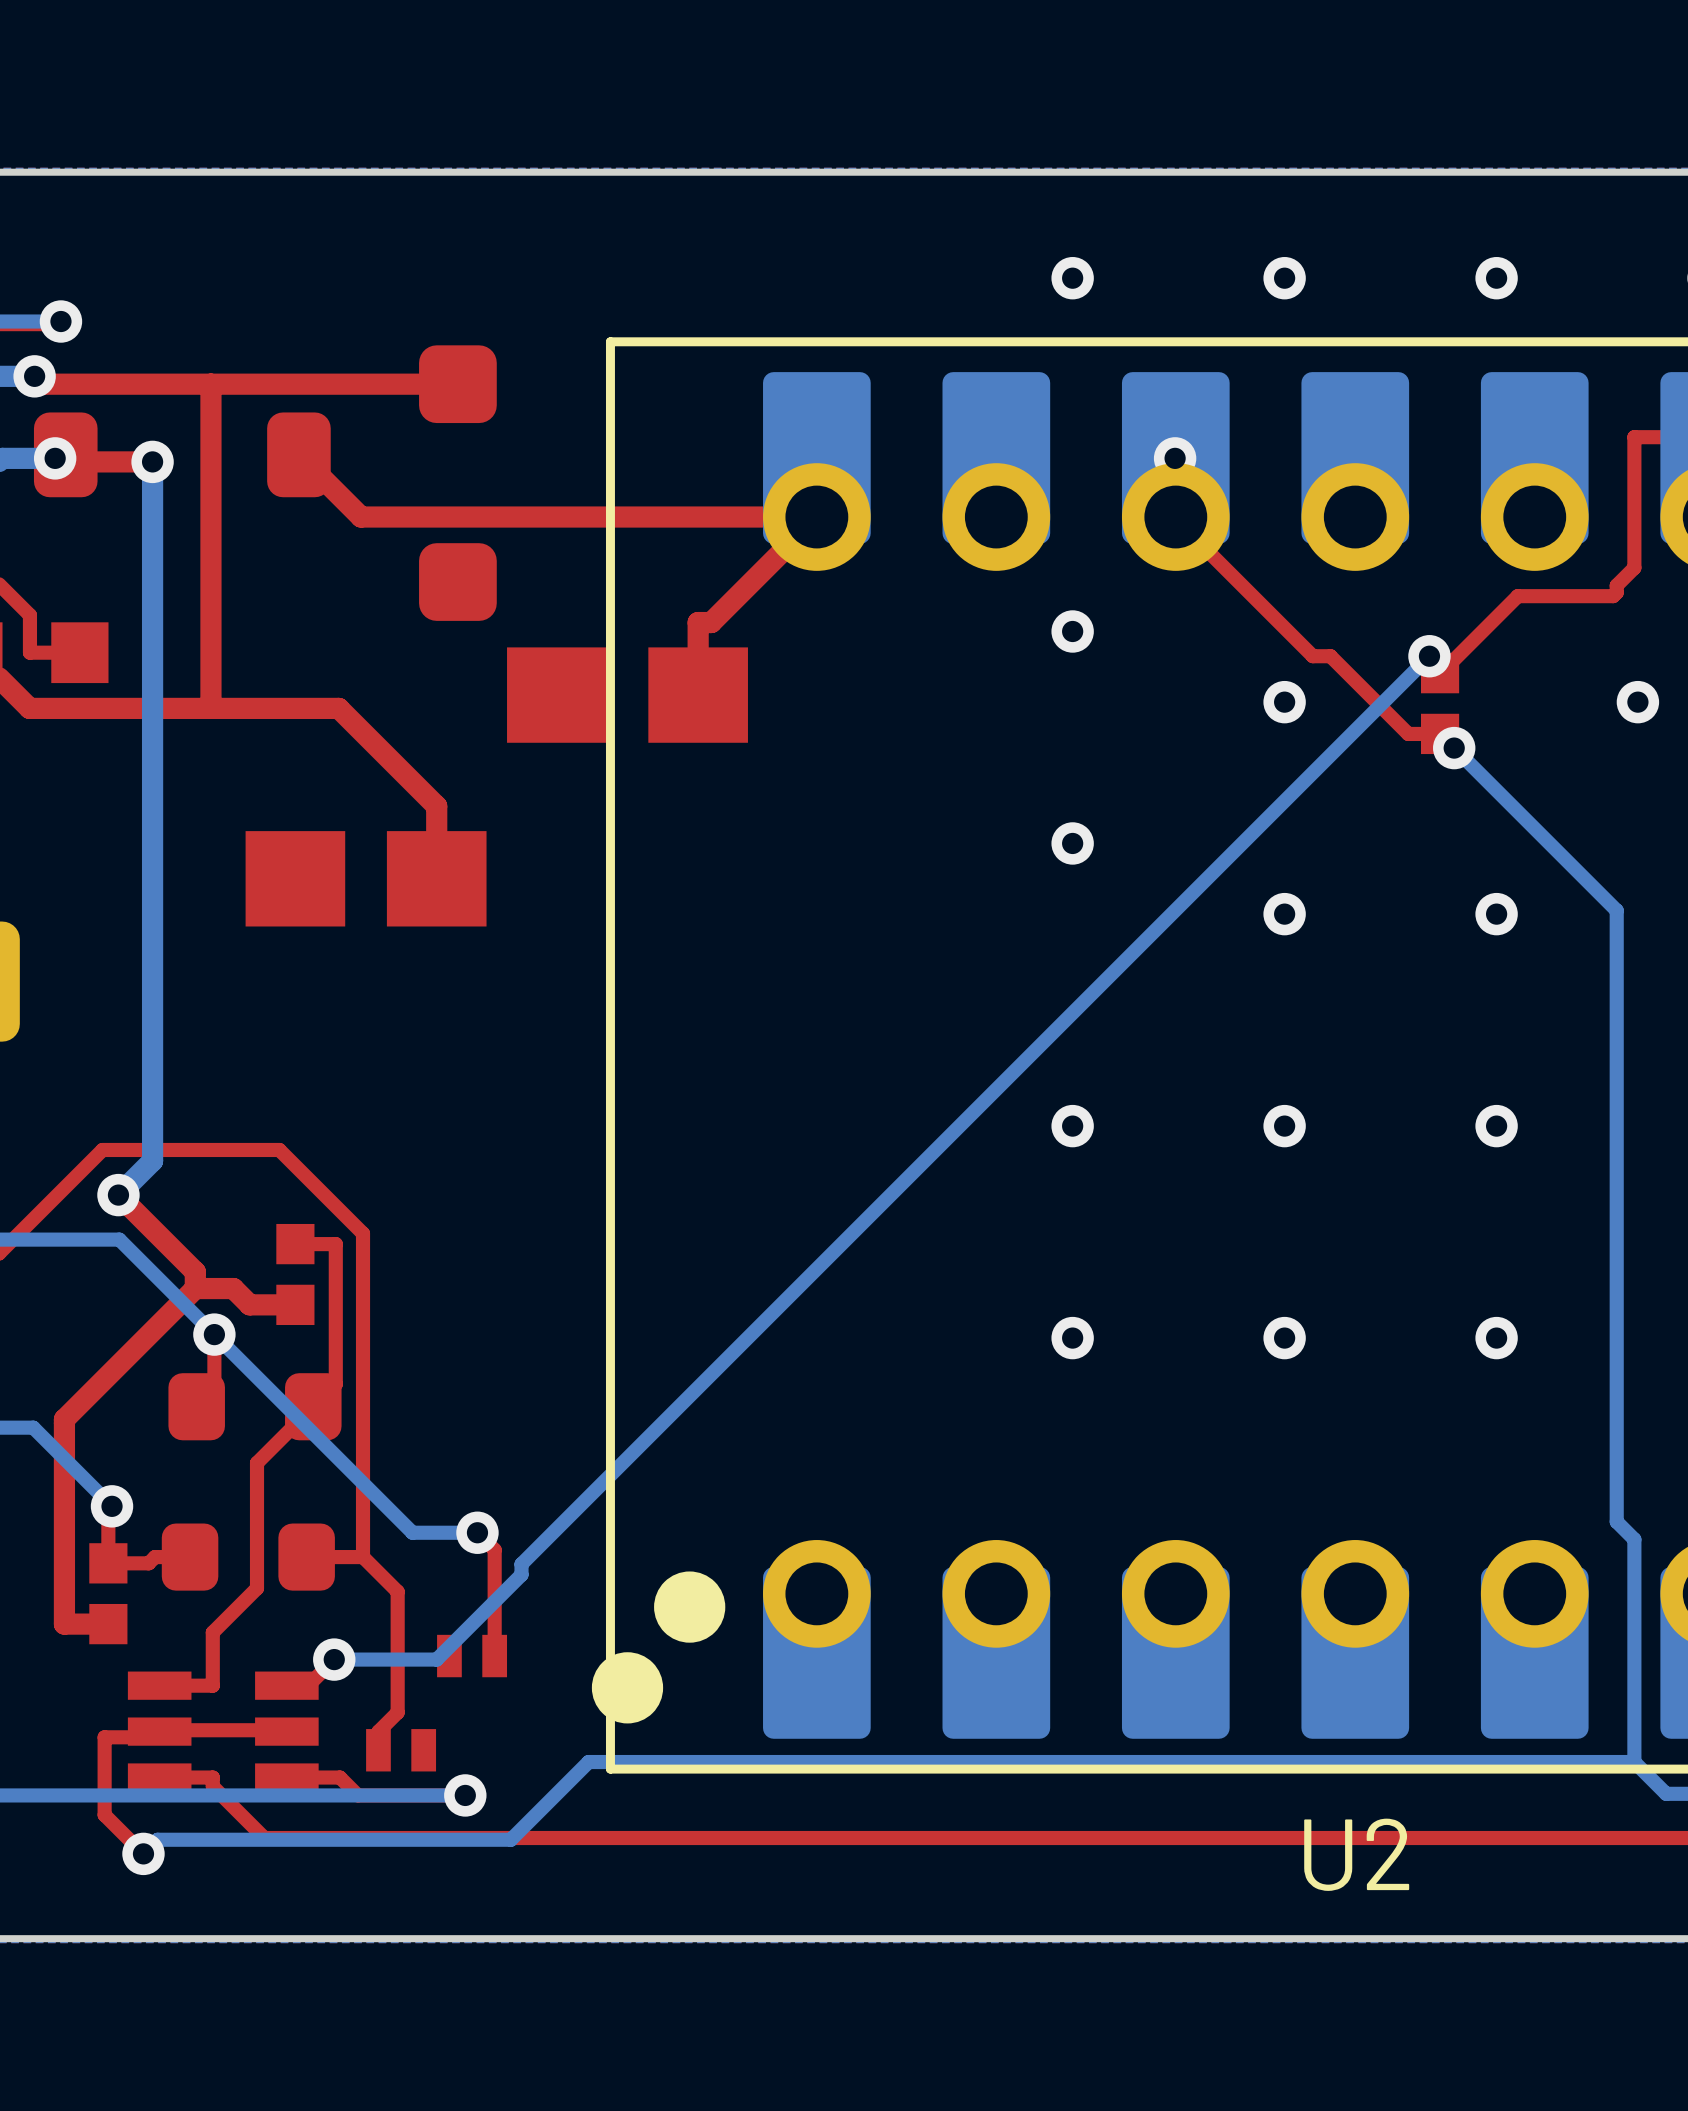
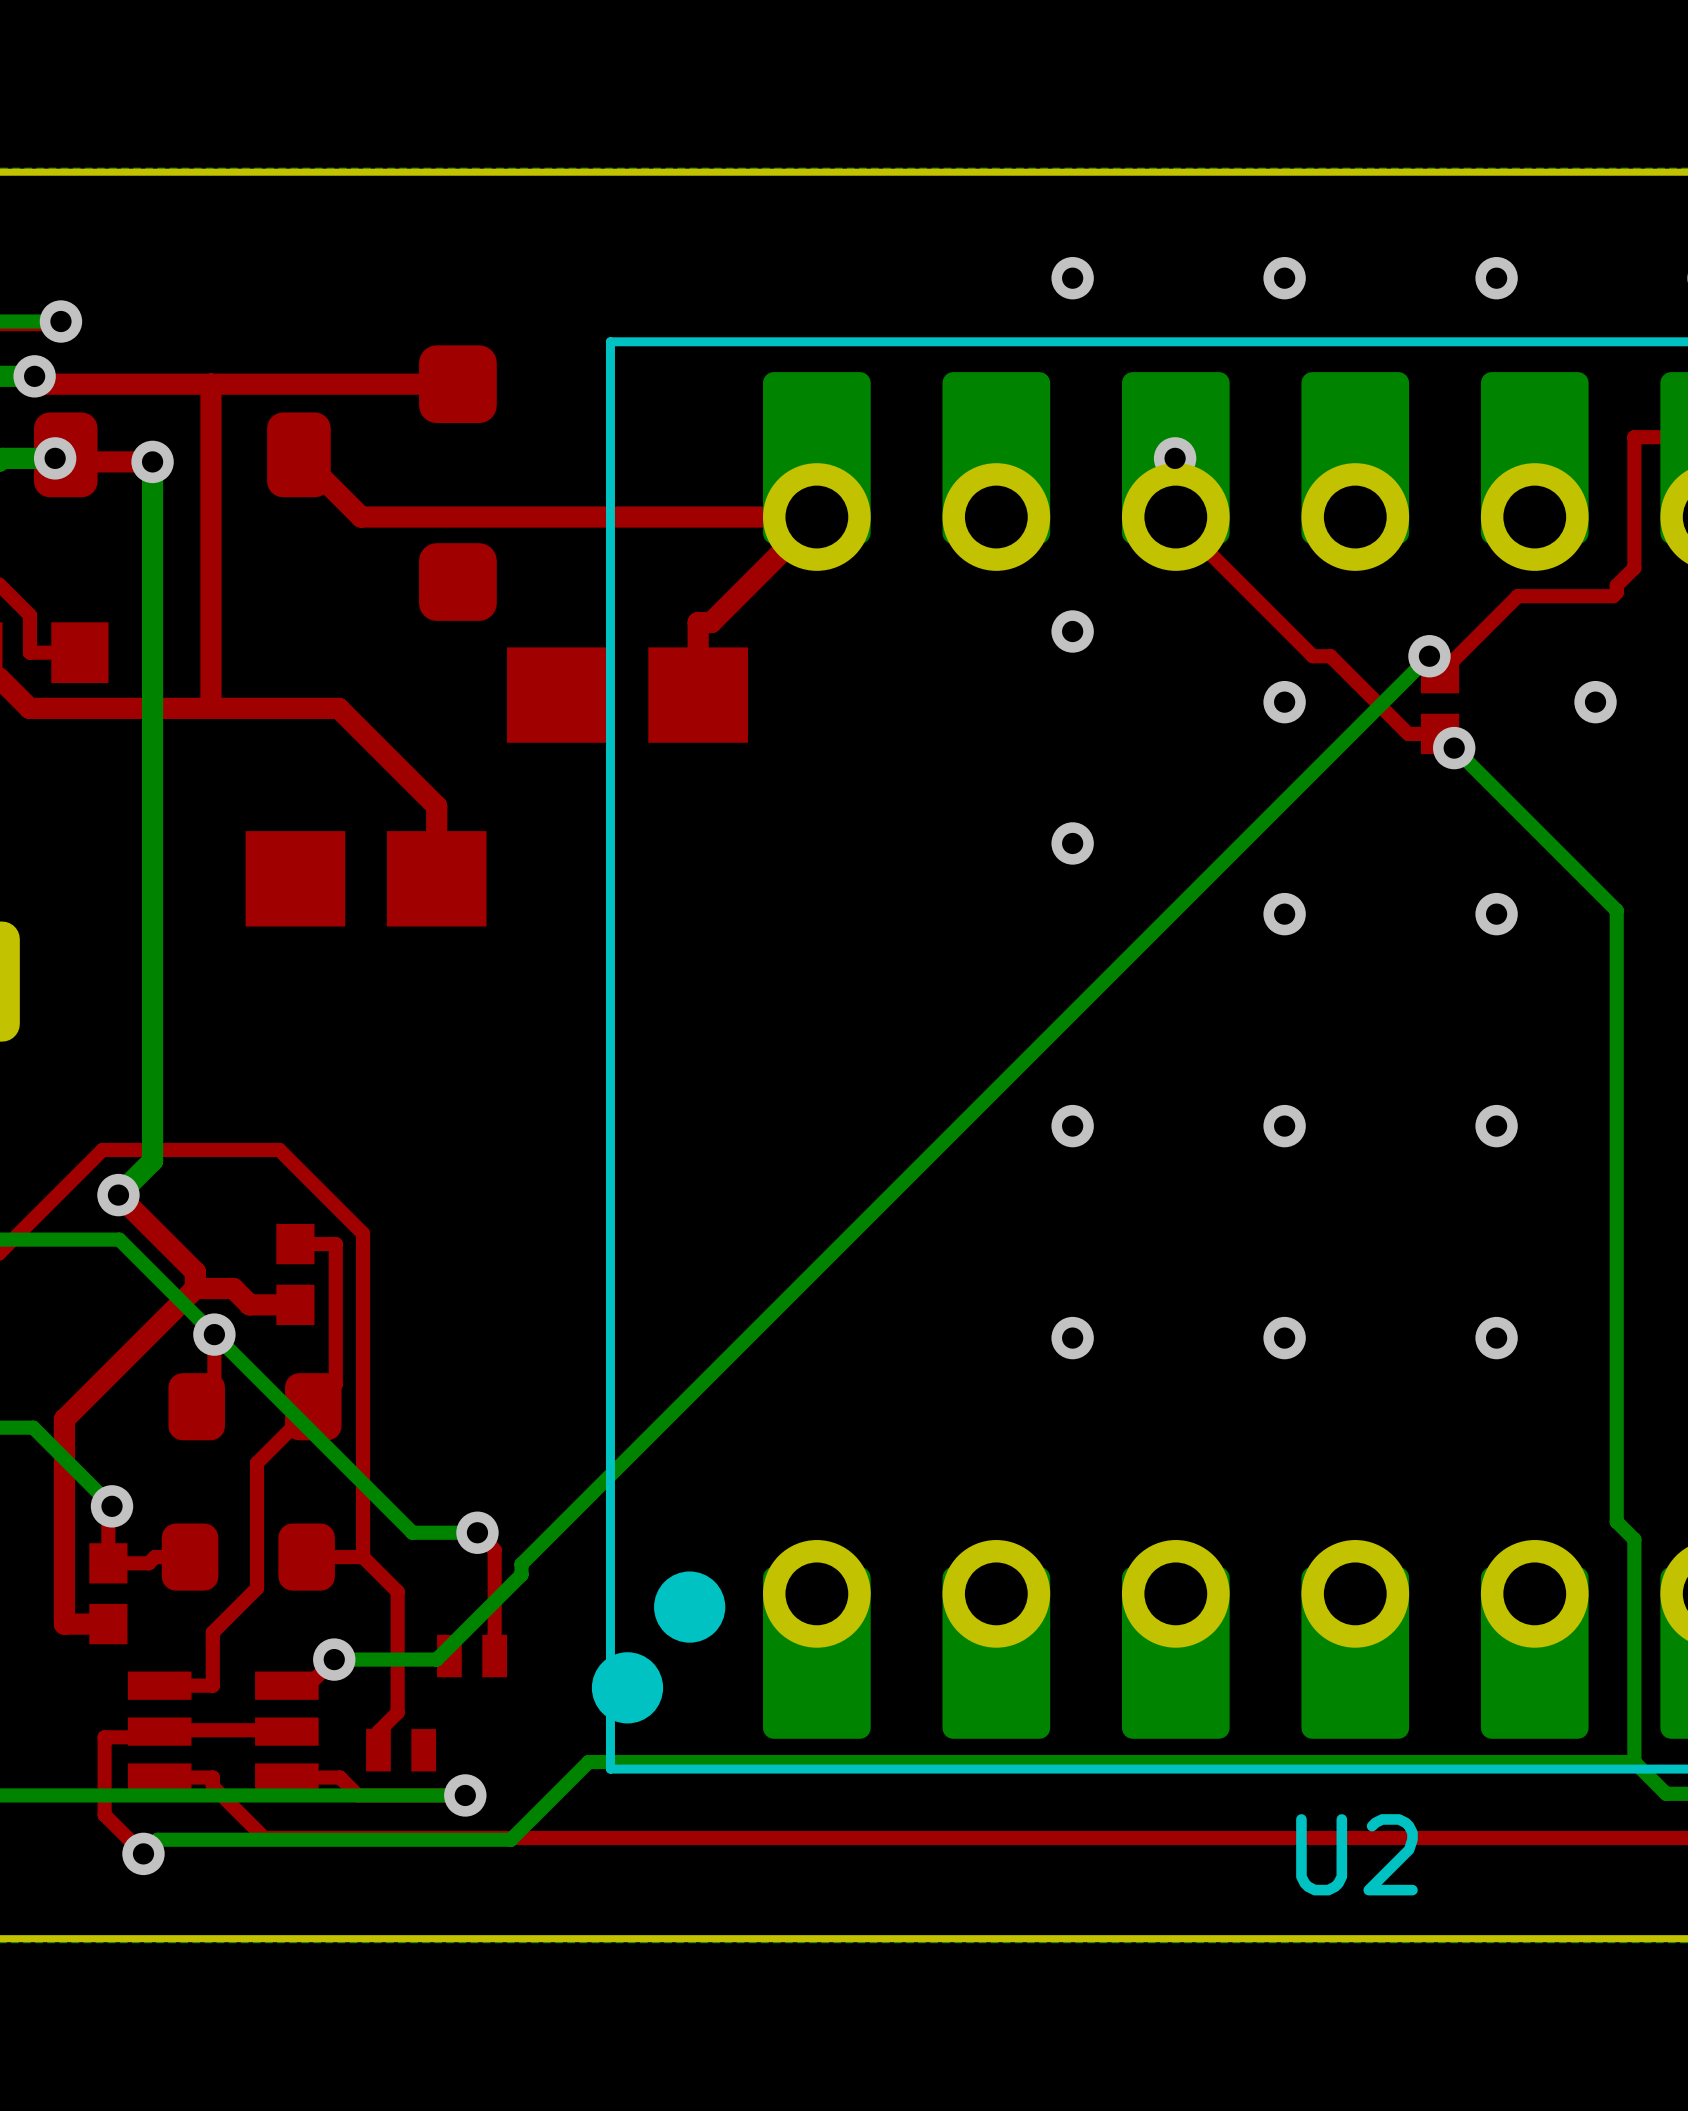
via position: (1637, 702) -> (1595, 702)

